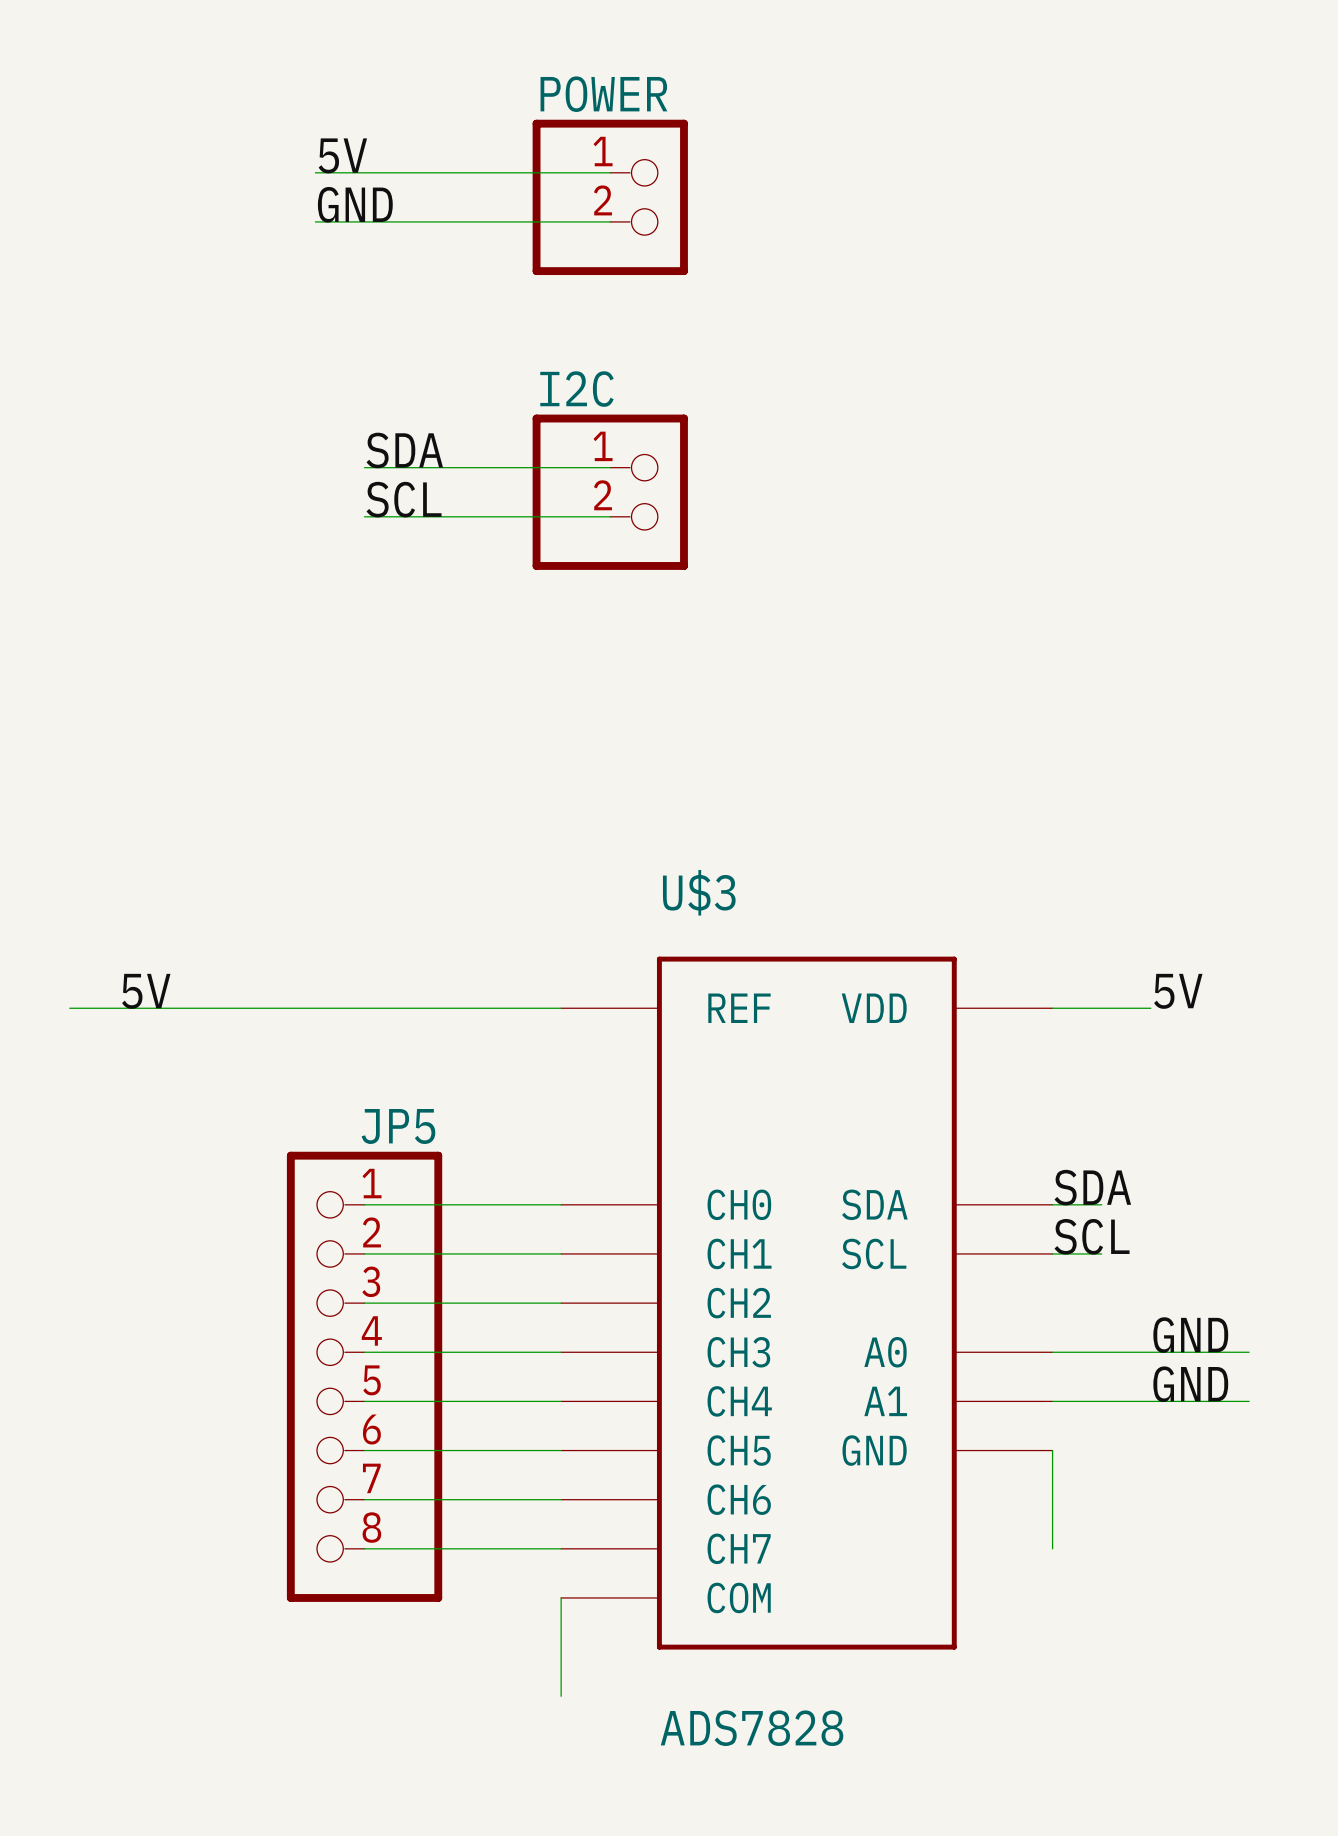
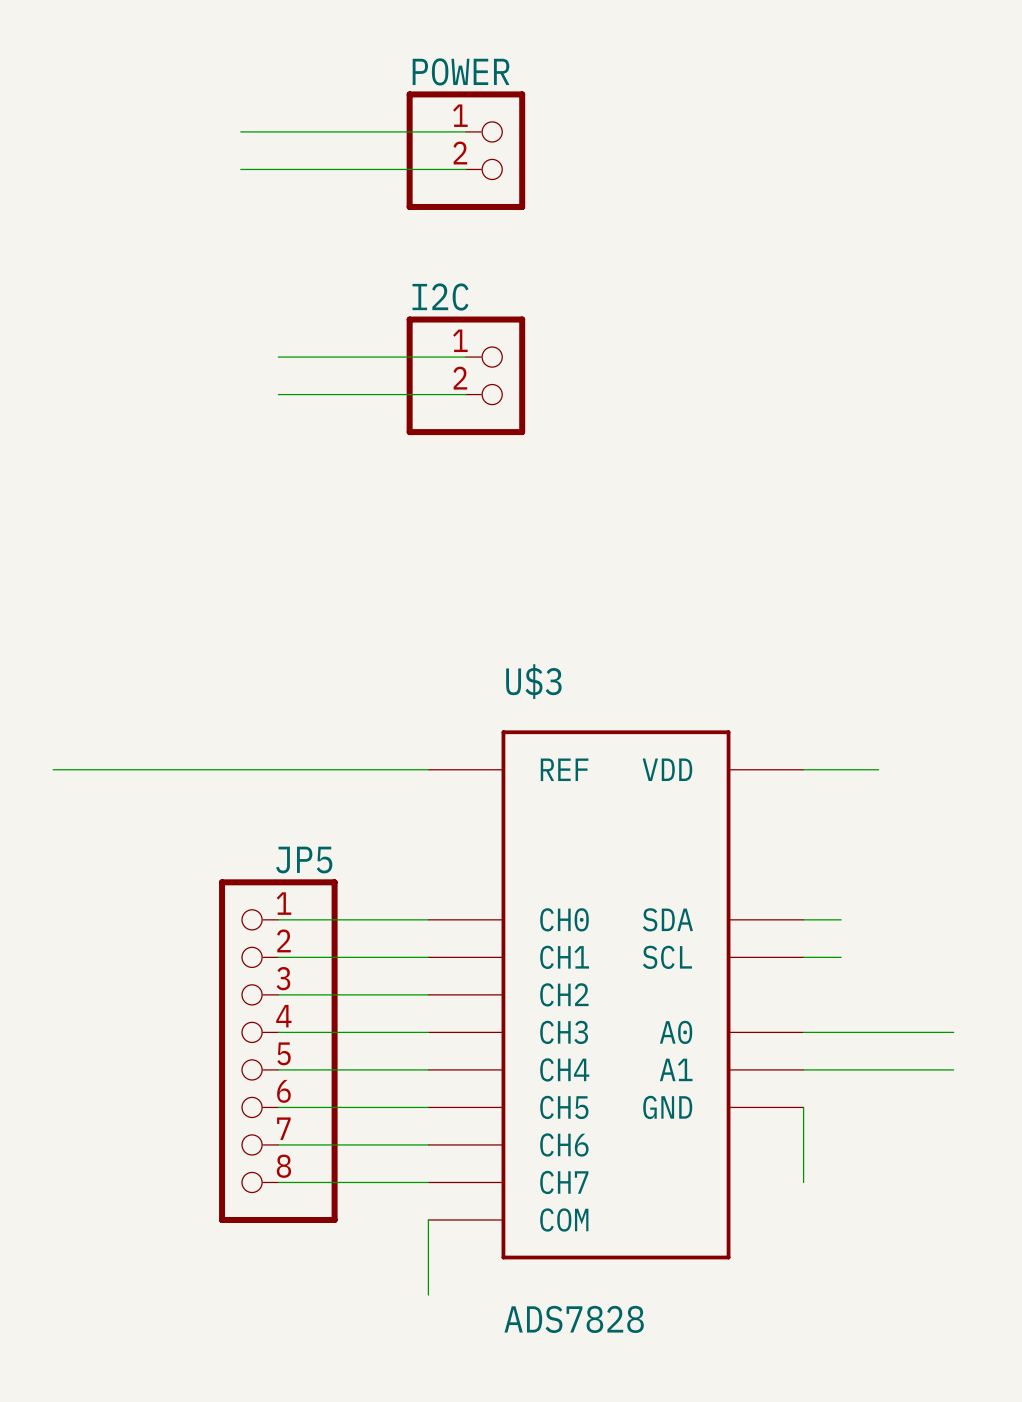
label: 5V (342, 155) -> none
label: GND (355, 204) -> none
label: SDA (404, 450) -> none
label: SCL (404, 499) -> none
label: 5V (146, 991) -> none
label: 5V (1178, 991) -> none
label: SDA (1092, 1187) -> none
label: SCL (1092, 1236) -> none
label: GND (1190, 1335) -> none
label: GND (1190, 1384) -> none

